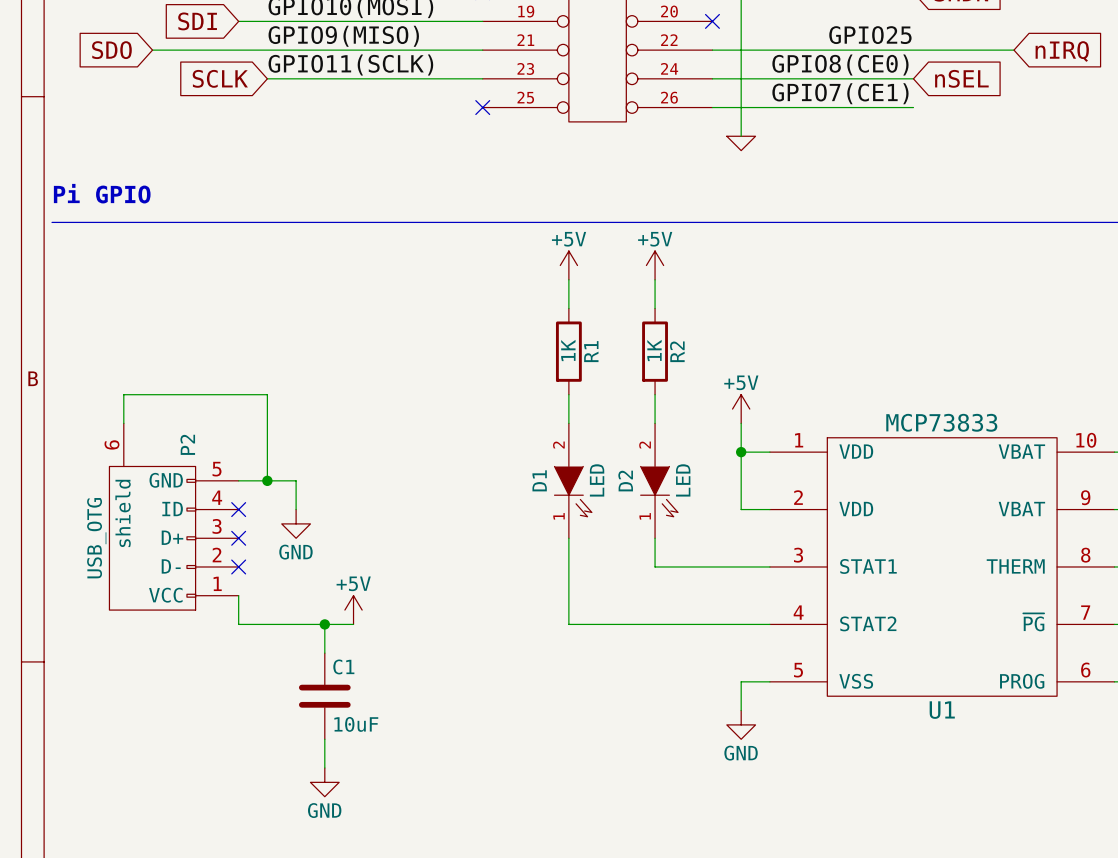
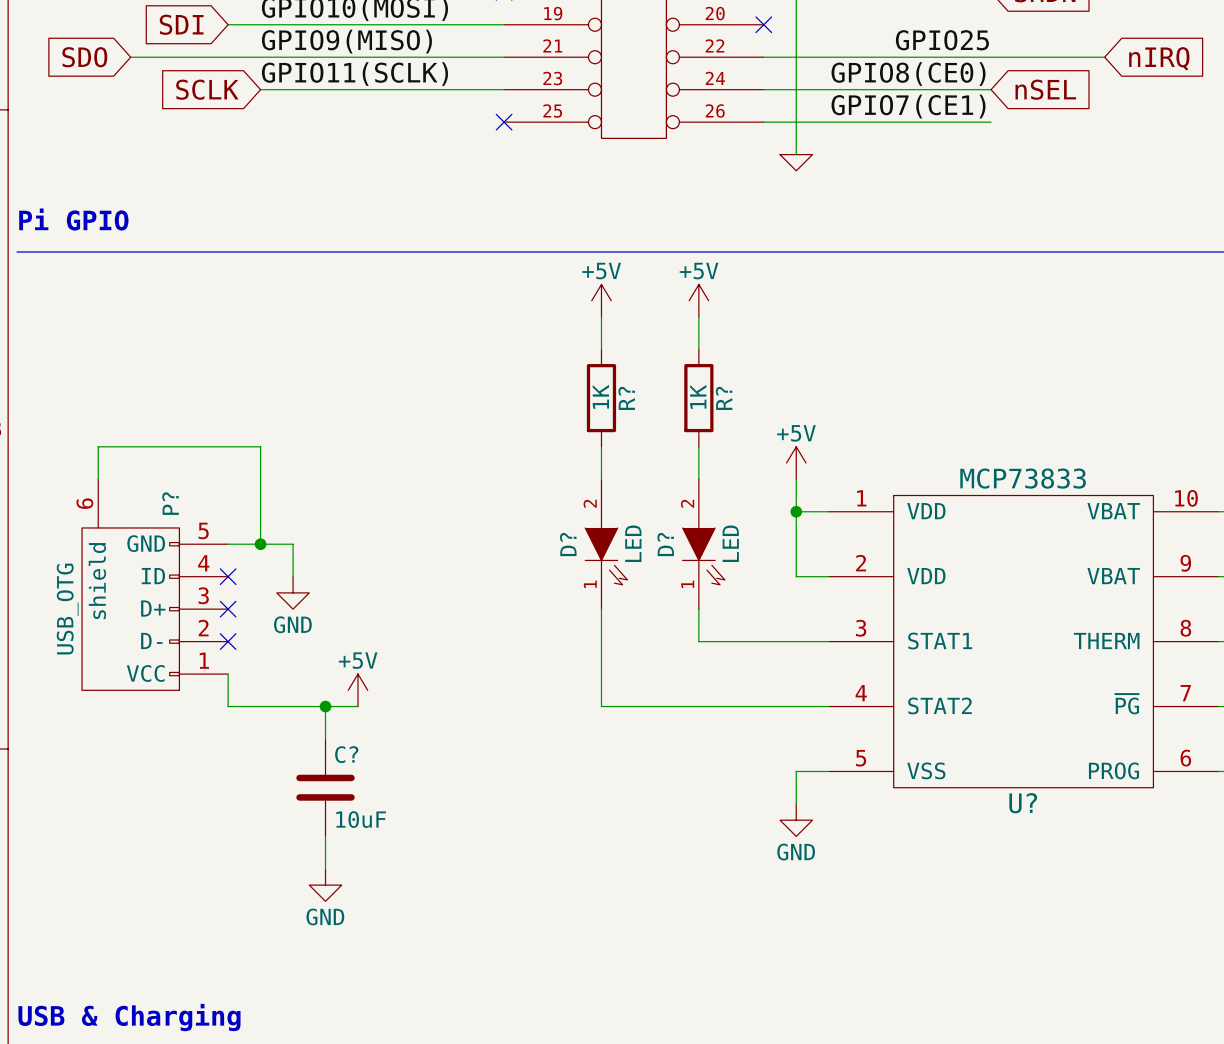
R1 name: R1 (591, 351) -> R? (626, 398)
R2 name: R2 (677, 351) -> R? (724, 398)
P2 name: P2 (187, 444) -> P? (170, 503)
D1 name: D1 (539, 480) -> D? (568, 544)
D2 name: D2 (625, 481) -> D? (665, 544)
C1 name: C1 (343, 666) -> C? (346, 754)
U1 name: U1 (942, 710) -> U? (1023, 803)

